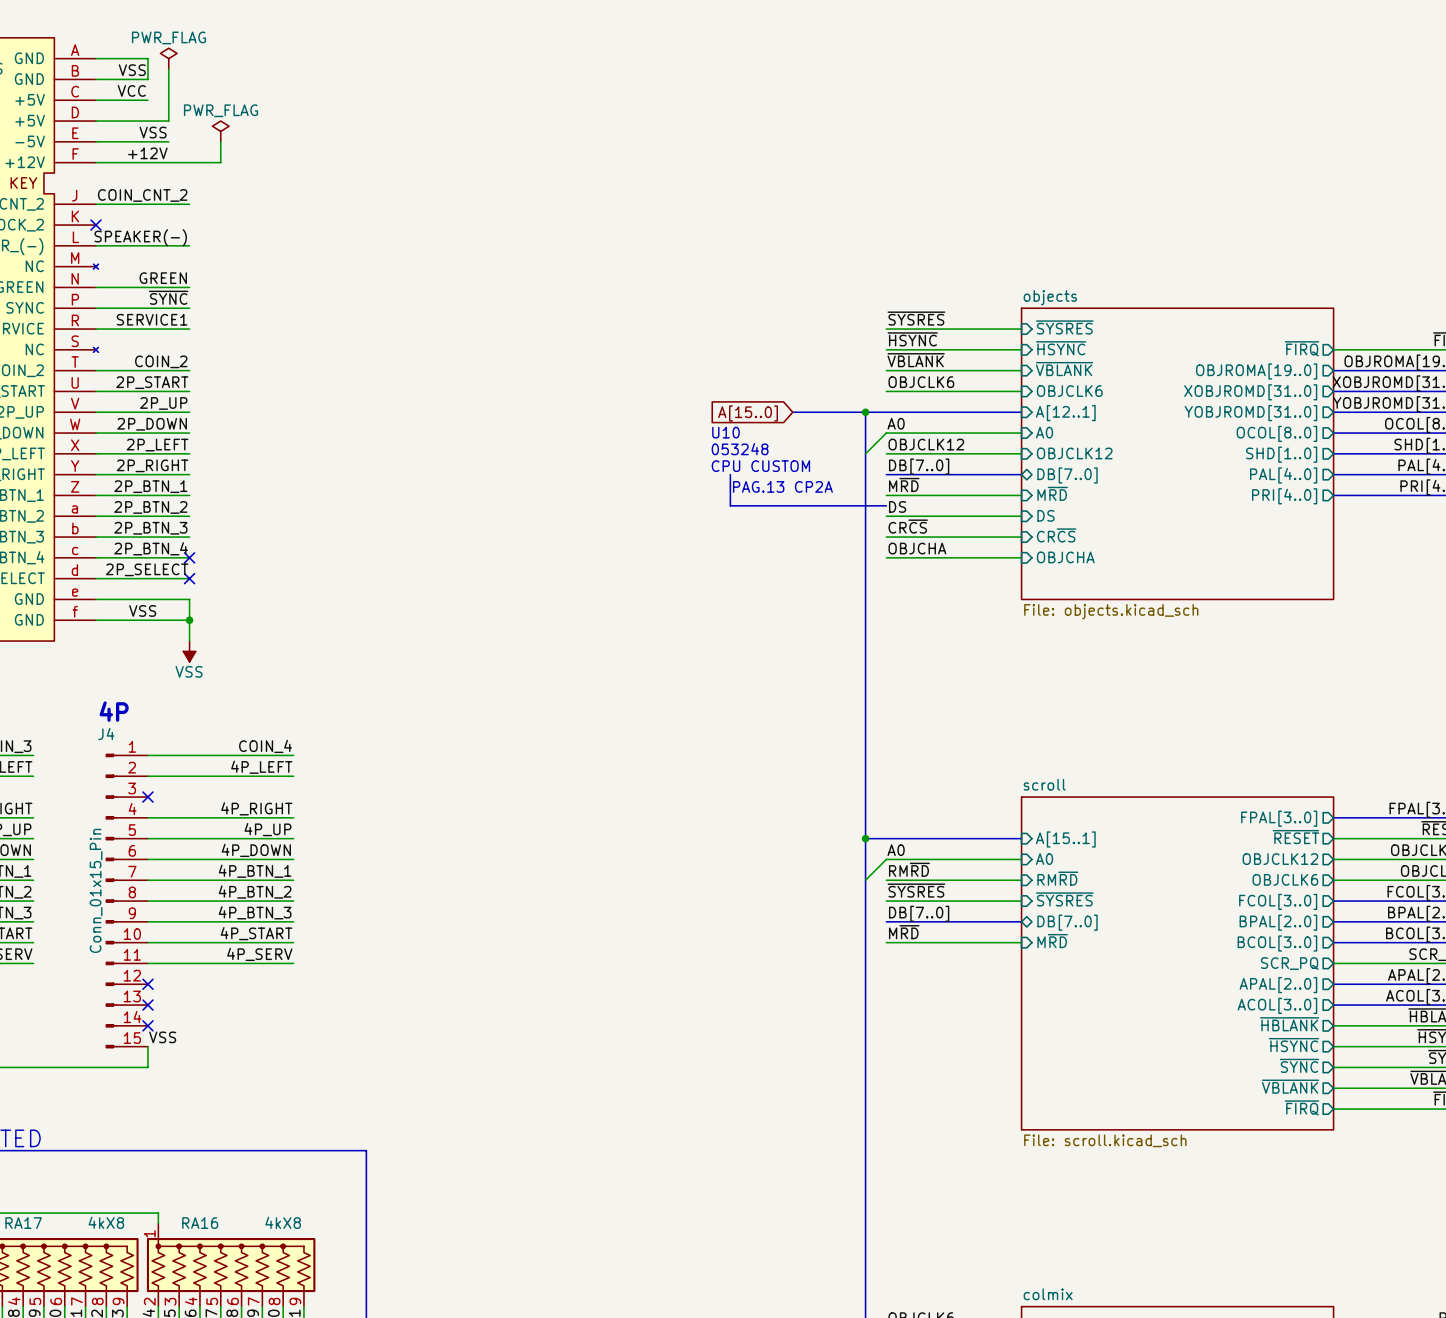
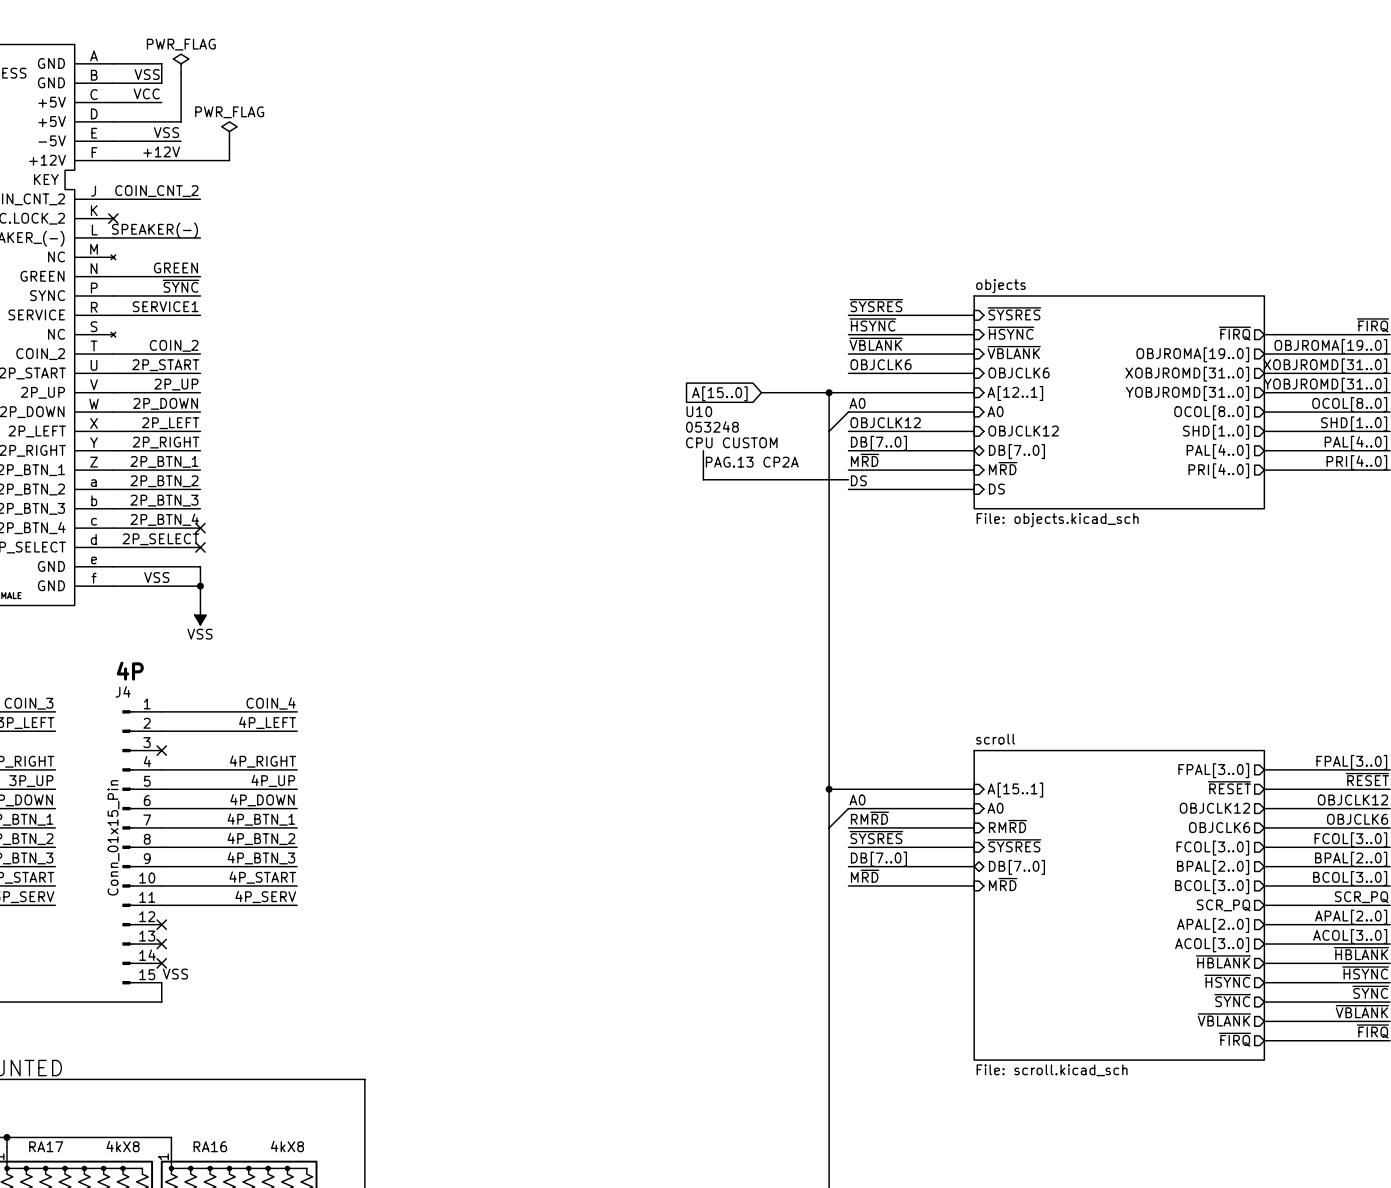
sheet objects: none -> File: objects.kicad_sch (1119, 402)
sheet objects: File: objects.kicad_sch (1177, 453) -> none
label: CR~{CS} (908, 526) -> none
sheet pin: CR~{CS} (1056, 535) -> none
wire: (886, 537) (1021, 537) -> none
label: OBJCHA (917, 548) -> none
wire: (886, 557) (1021, 557) -> none
sheet pin: OBJCHA (1065, 557) -> none

